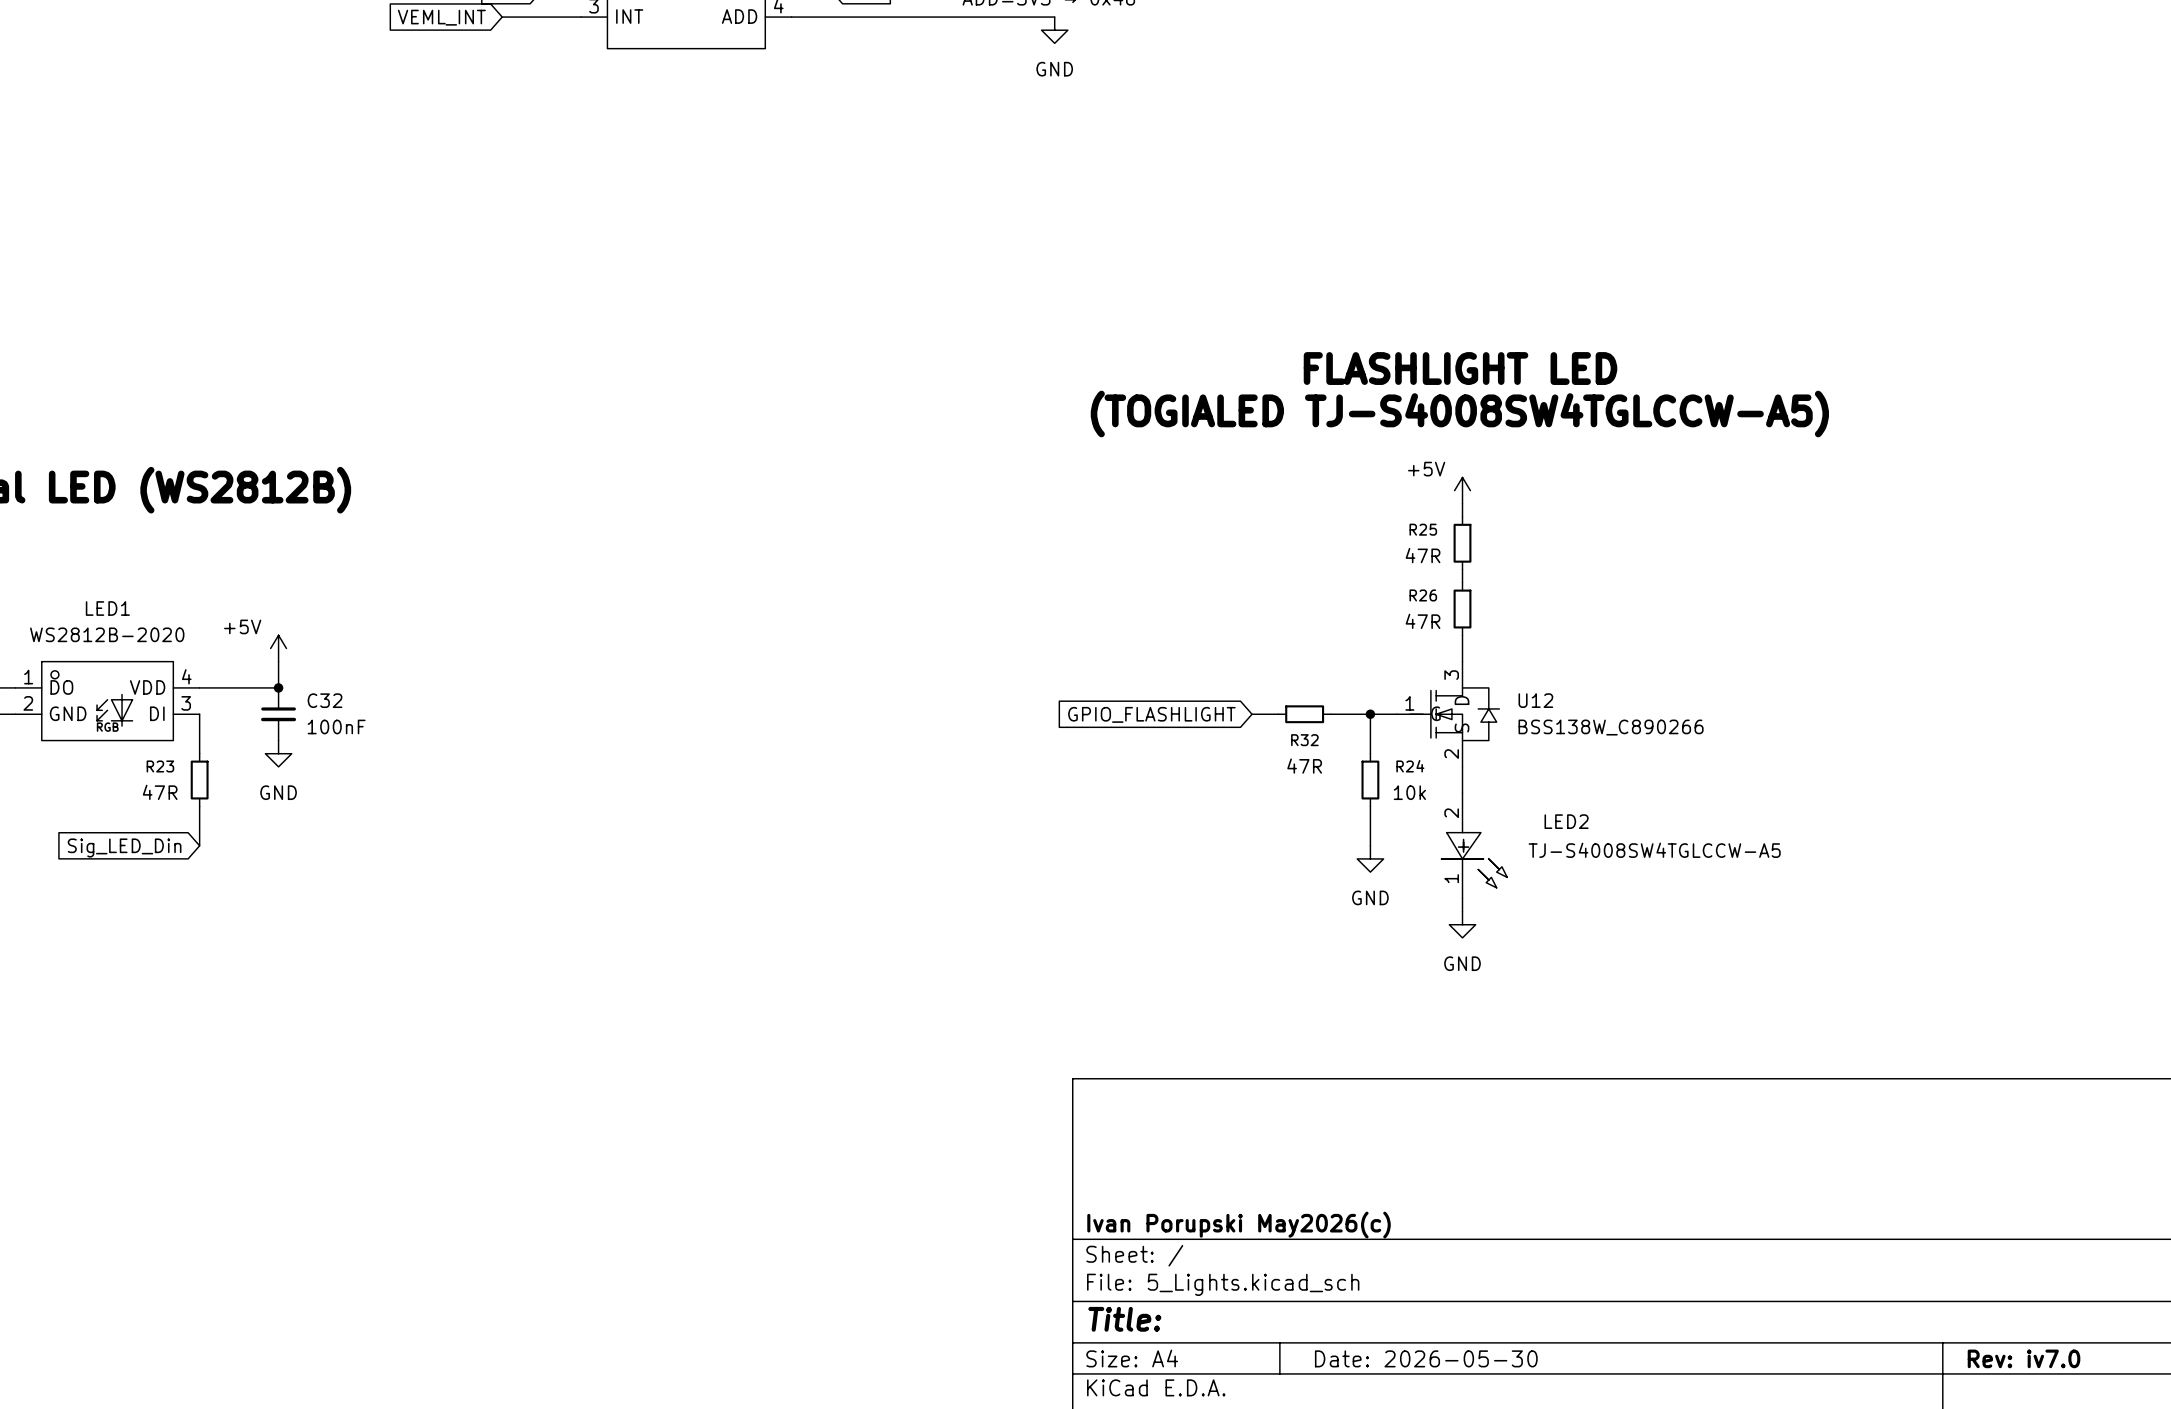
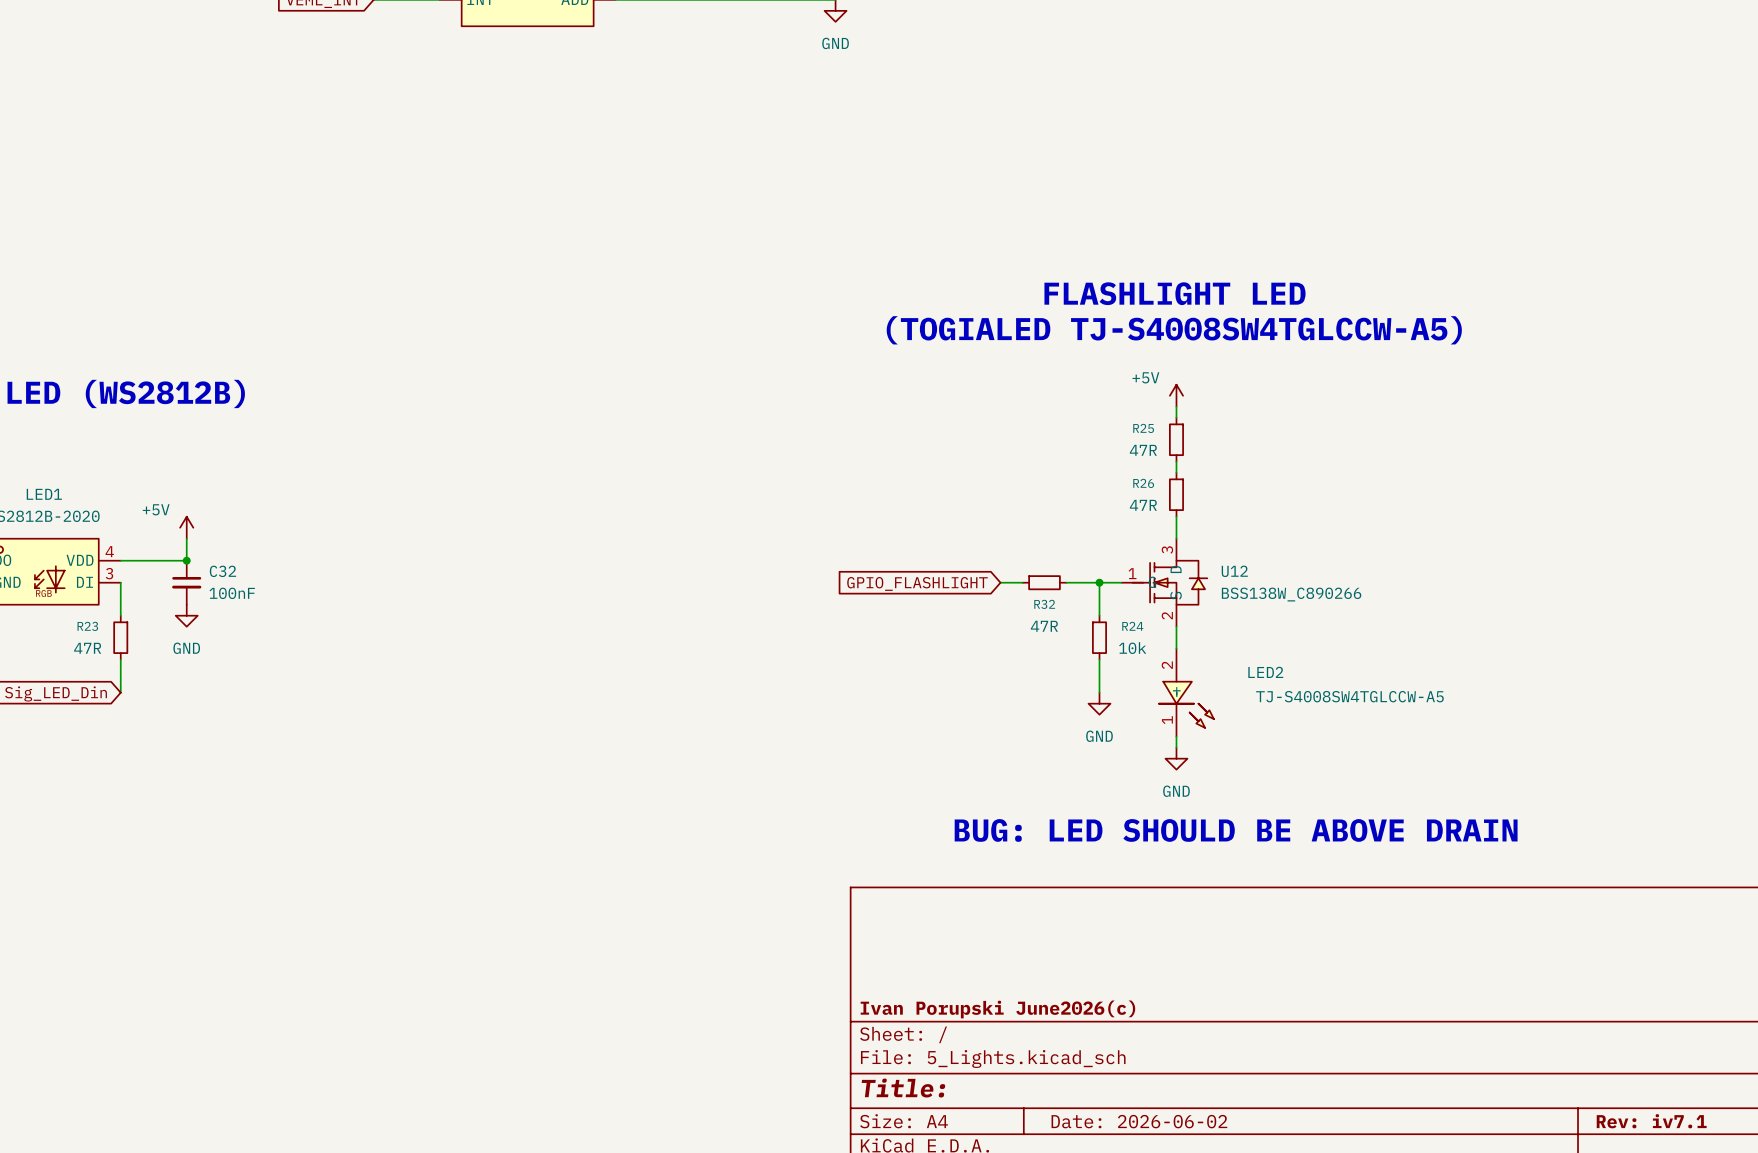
text: none -> BUG: LED SHOULD BE ABOVE DRAIN (1236, 830)
title block: Ivan Porupski May2026(c) (1239, 1225) -> Ivan Porupski June2026(c) (997, 1009)
title block: Date: 2026-05-30 (1426, 1358) -> Date: 2026-06-02 (1139, 1121)
title block: Rev: iv7.0 (2024, 1358) -> Rev: iv7.1 (1651, 1121)

